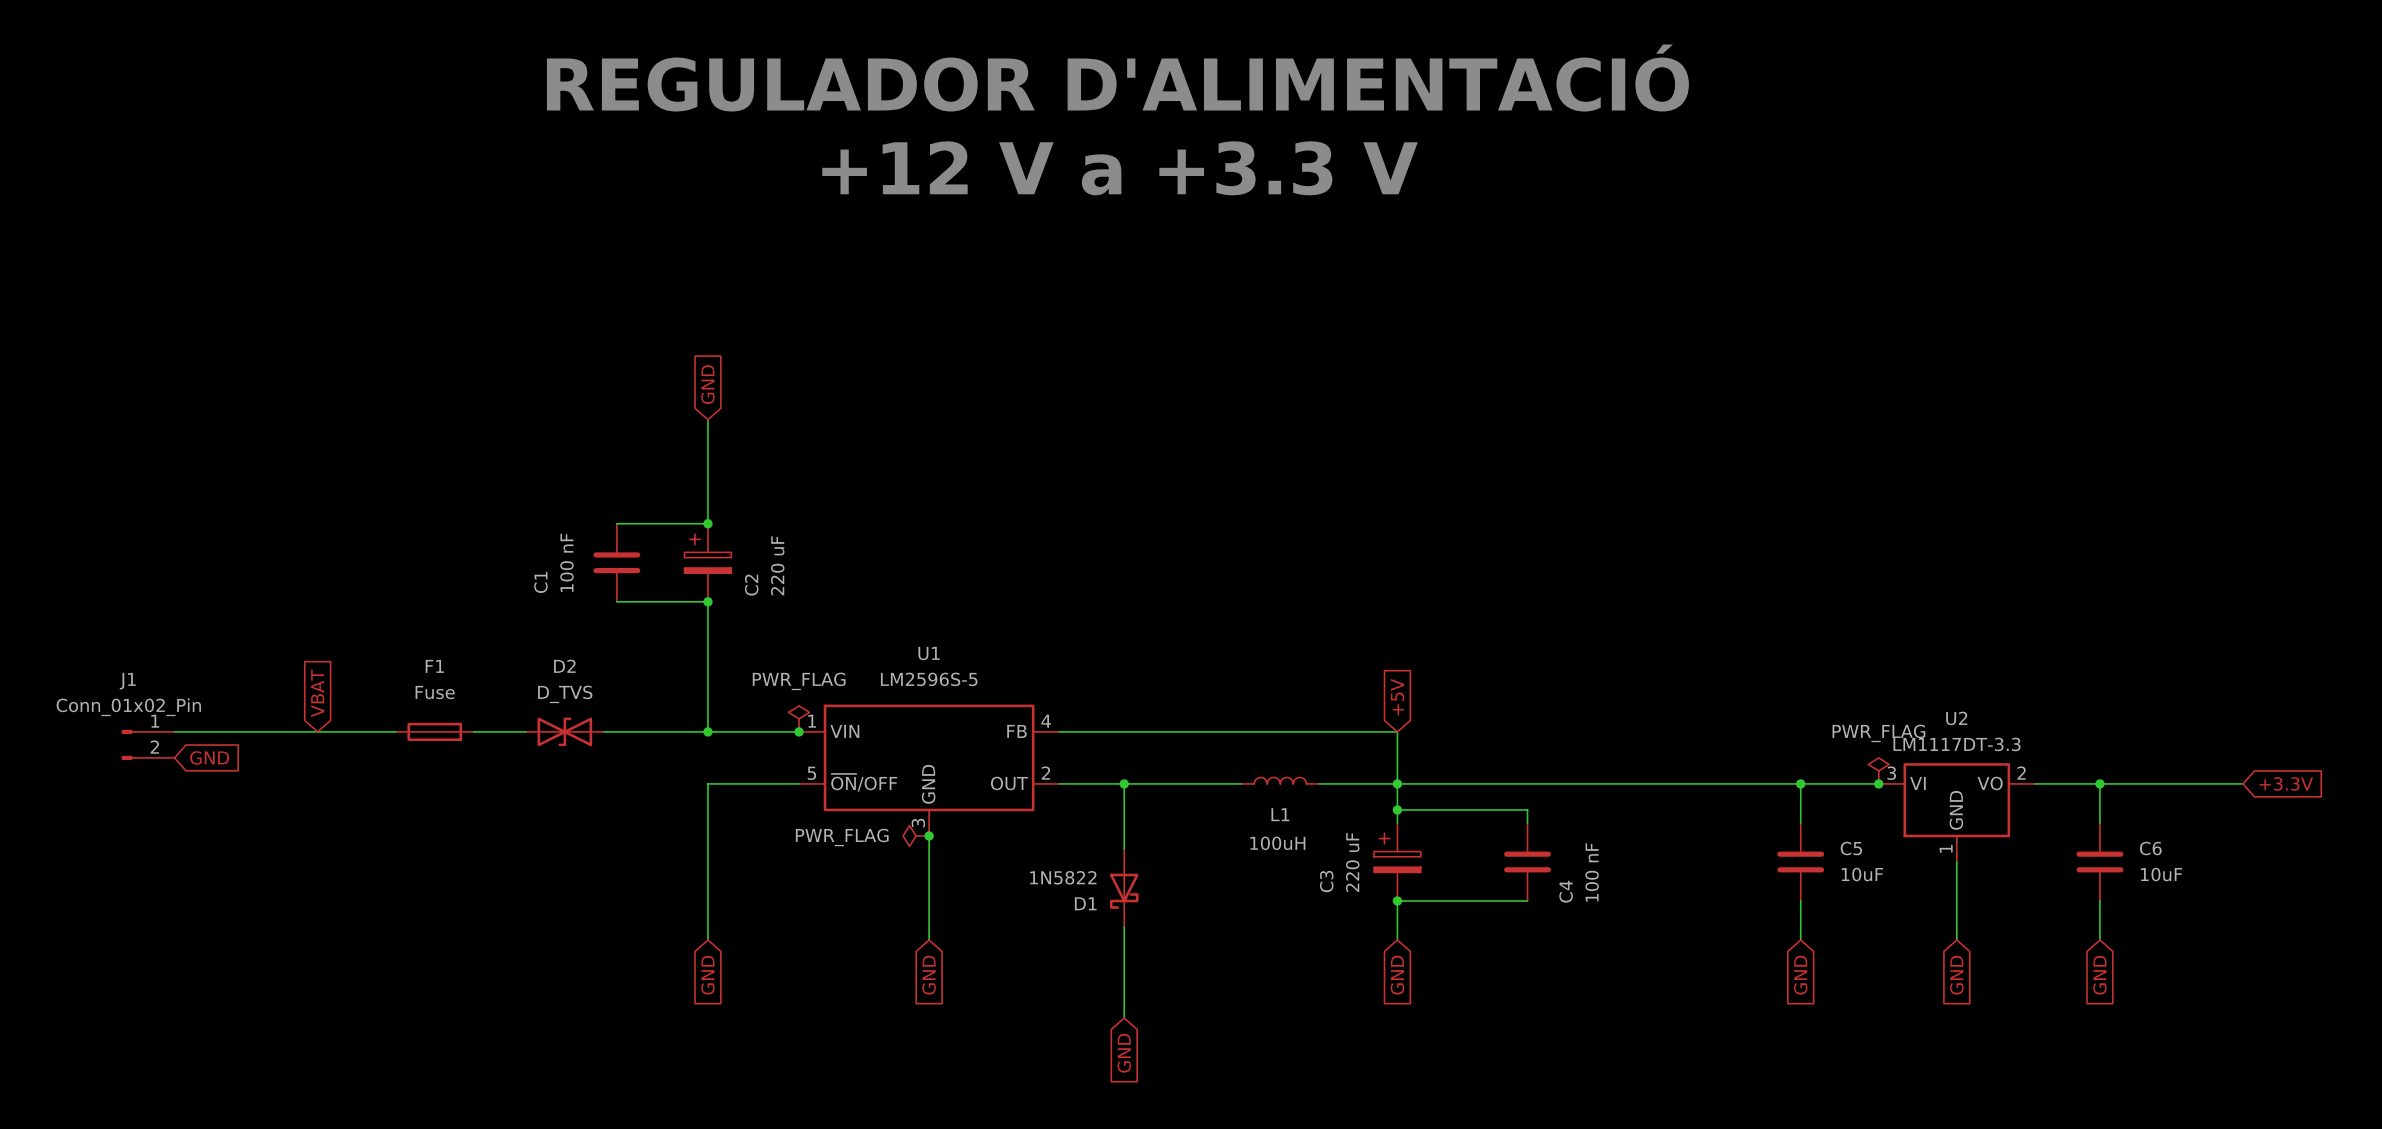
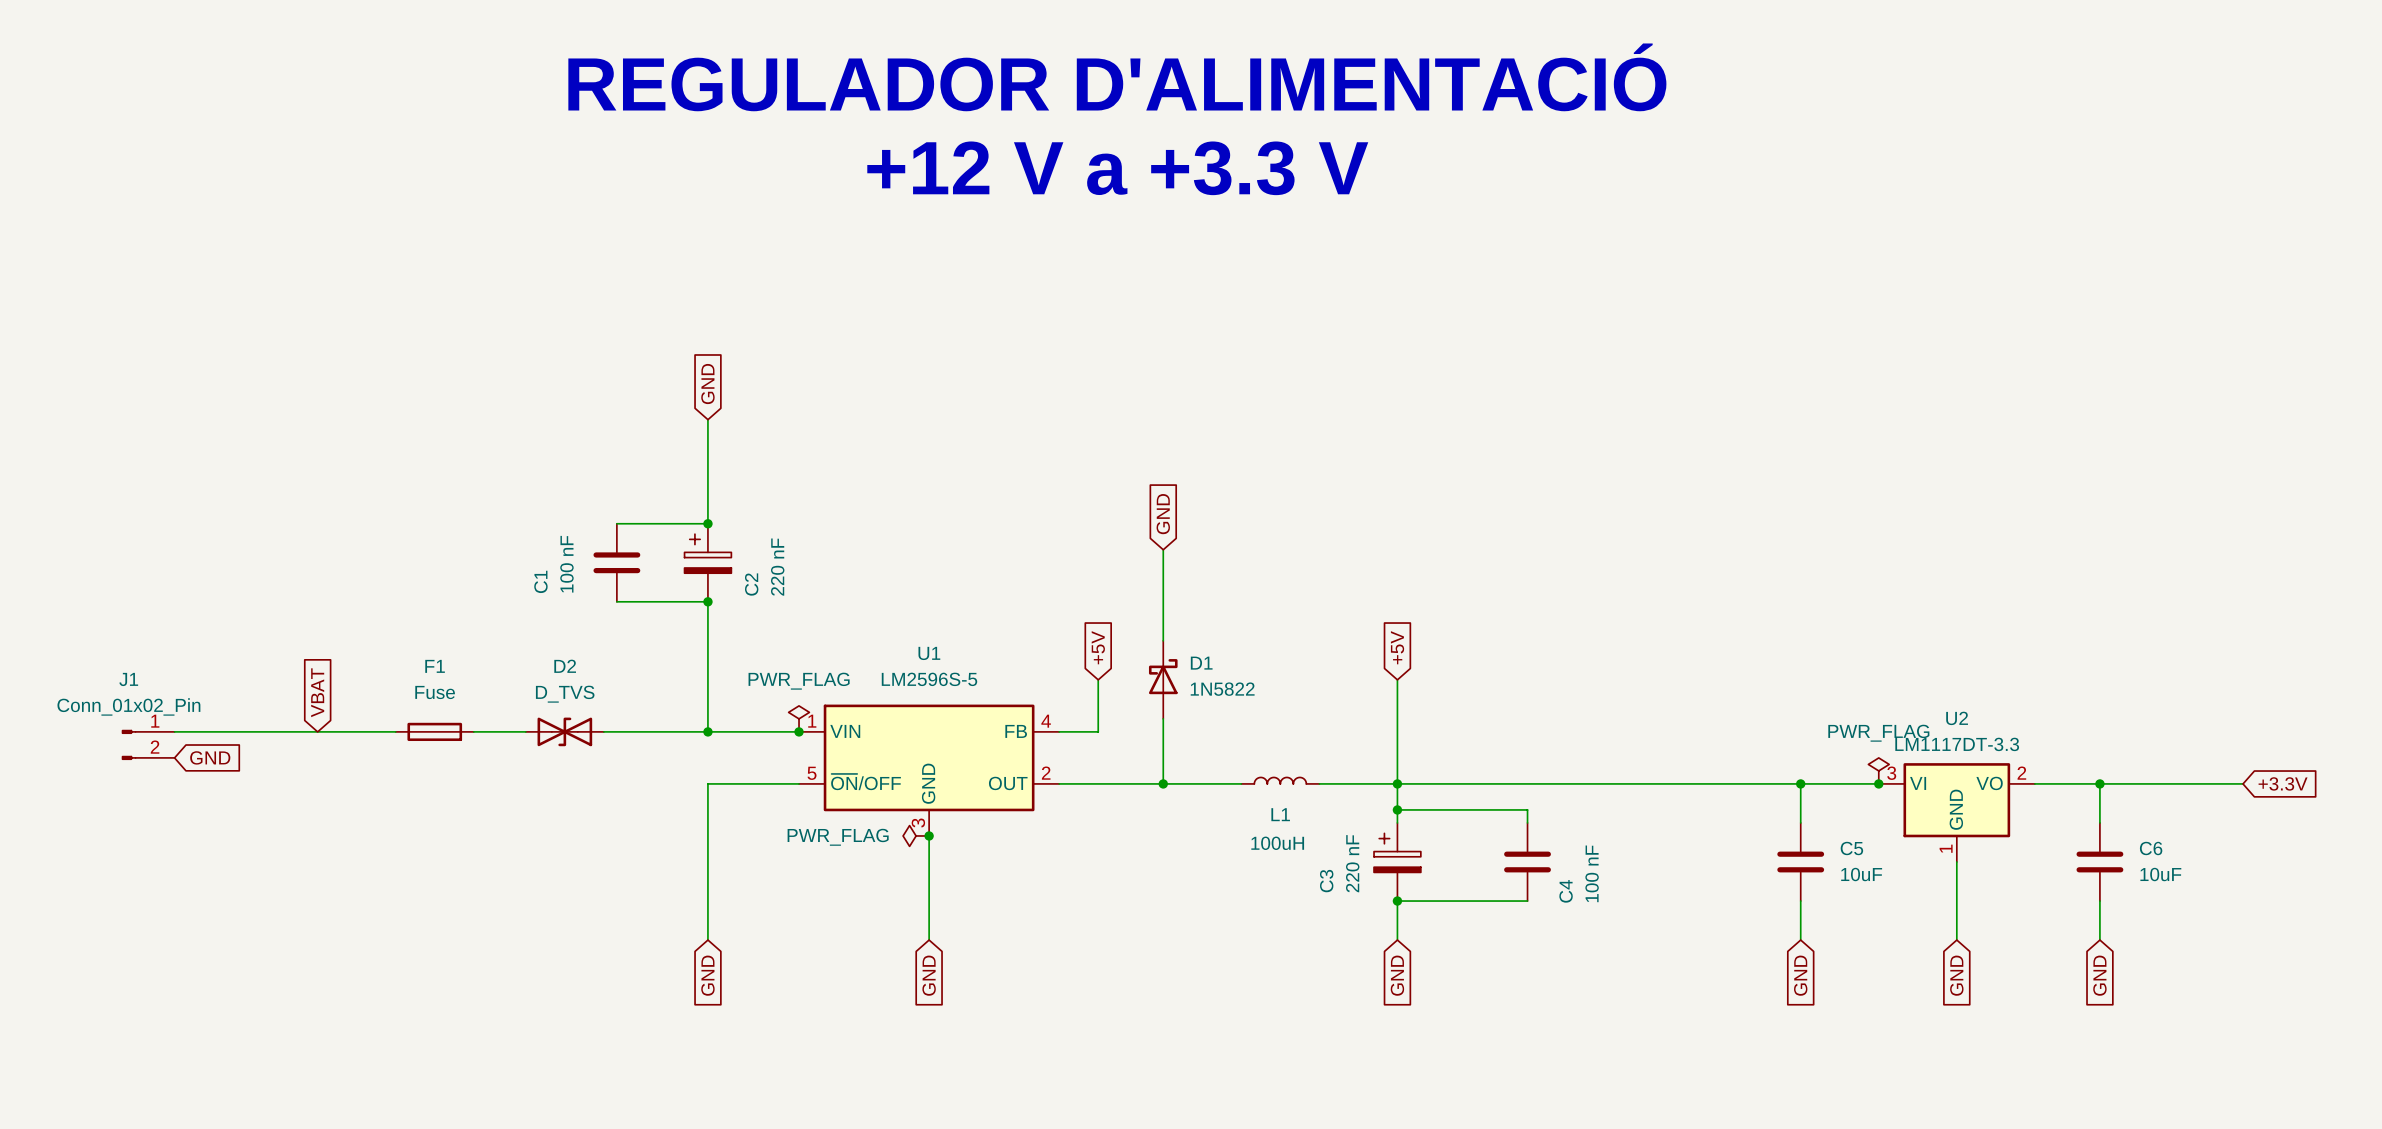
global label: none -> GND (1163, 514)
wire: none -> (1163, 549) (1163, 640)
C2 value: 220 uF (777, 565) -> 220 nF (777, 567)
global label: none -> +5V (1098, 647)
wire: none -> (1397, 679) (1397, 731)
global label position: +5V (1397, 697) -> +5V (1397, 647)
wire: (1098, 731) (1397, 731) -> (1098, 731) (1098, 679)
wire: (1124, 783) (1124, 848) -> (1163, 718) (1163, 783)
junction position: (1124, 783) -> (1163, 783)
C3 value: 220 uF (1352, 862) -> 220 nF (1352, 863)
D1 position: (1124, 888) -> (1163, 679)
D1 rotation: 0° (1124, 891) -> 180° (1163, 676)
wire: (1124, 927) (1124, 1018) -> none
global label: GND (1124, 1053) -> none

